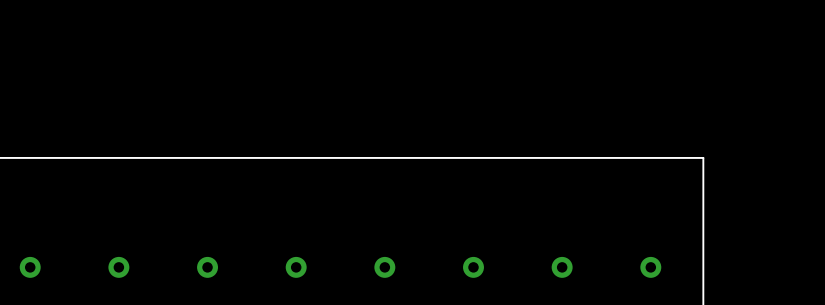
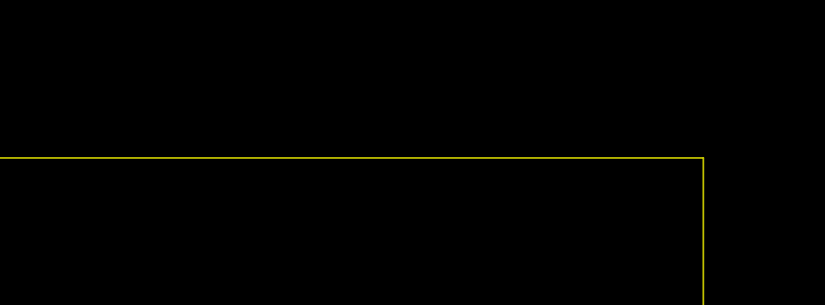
via: (30, 267) -> none
via: (118, 267) -> none
via: (207, 267) -> none
via: (296, 267) -> none
via: (384, 267) -> none
via: (473, 267) -> none
via: (562, 267) -> none
via: (650, 267) -> none

